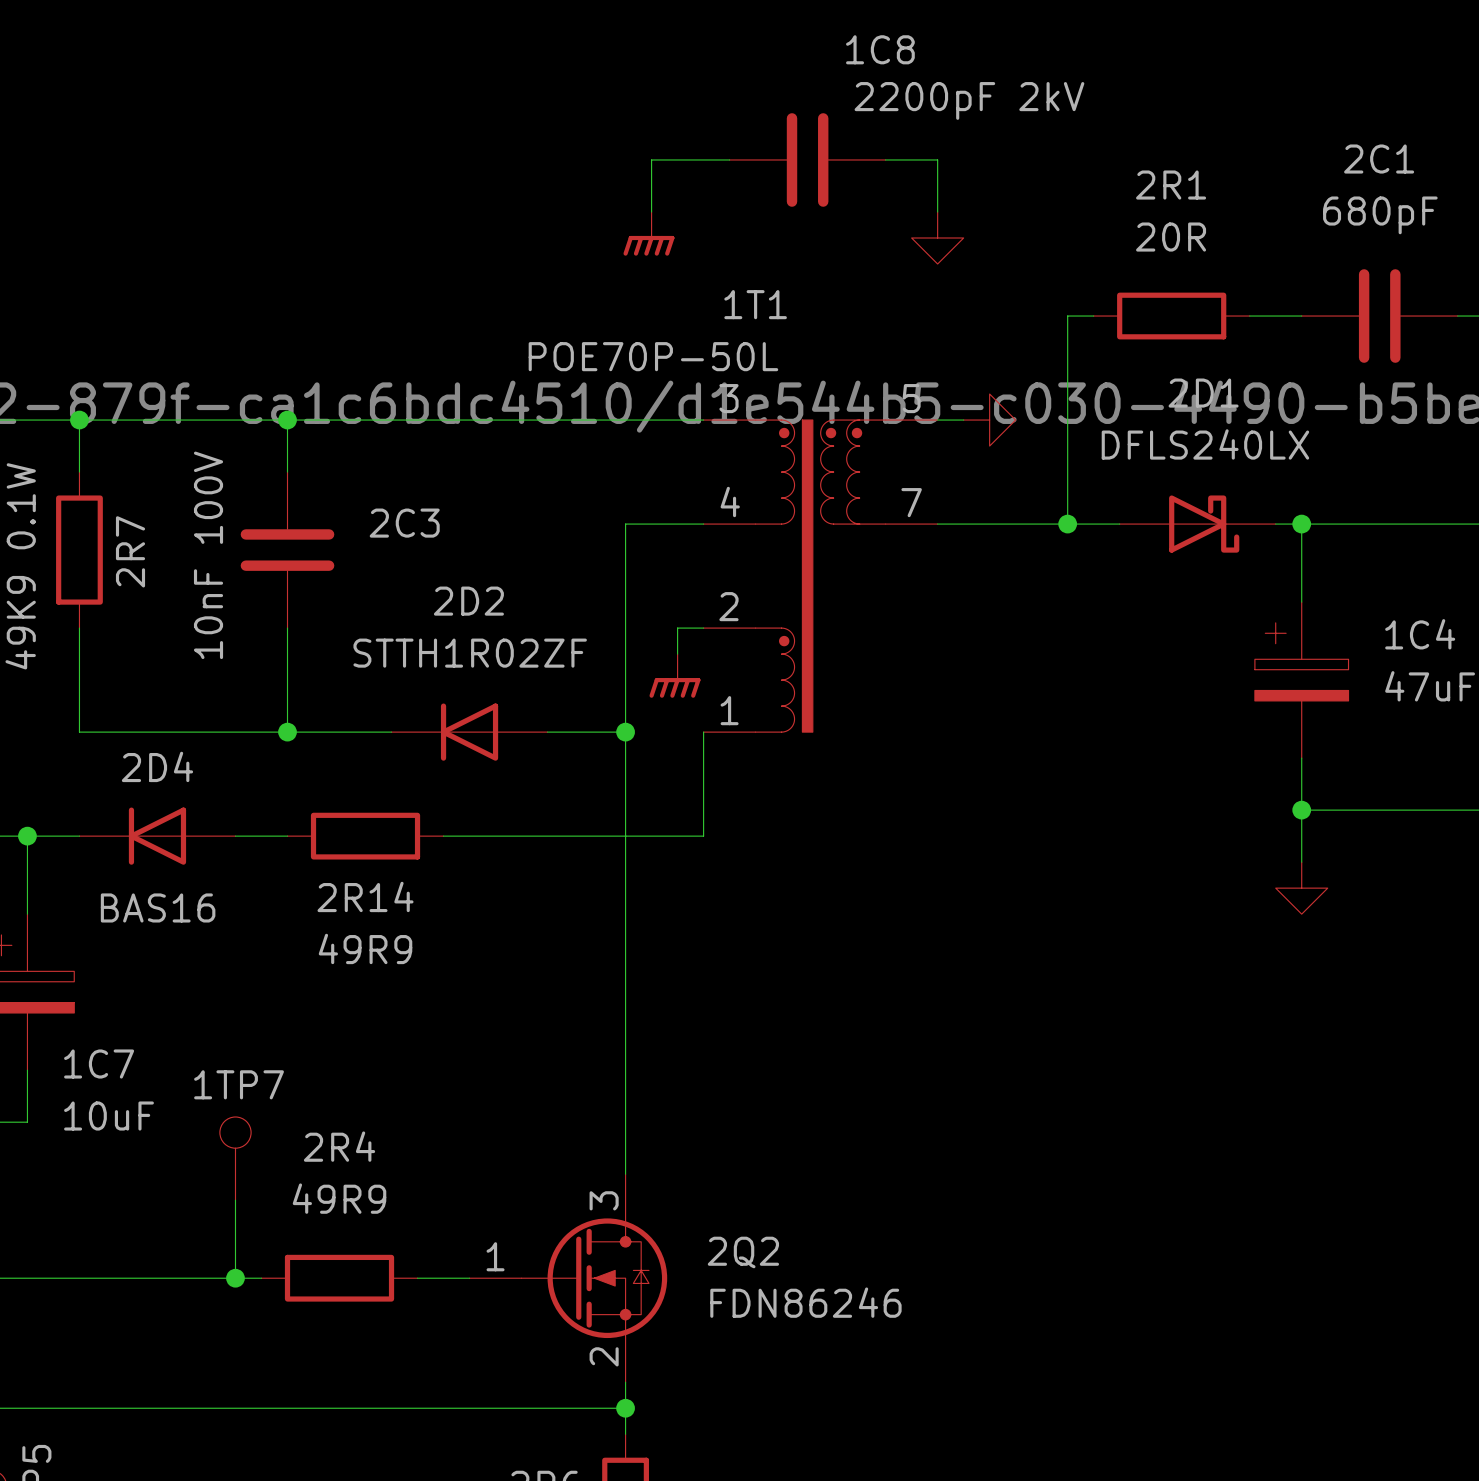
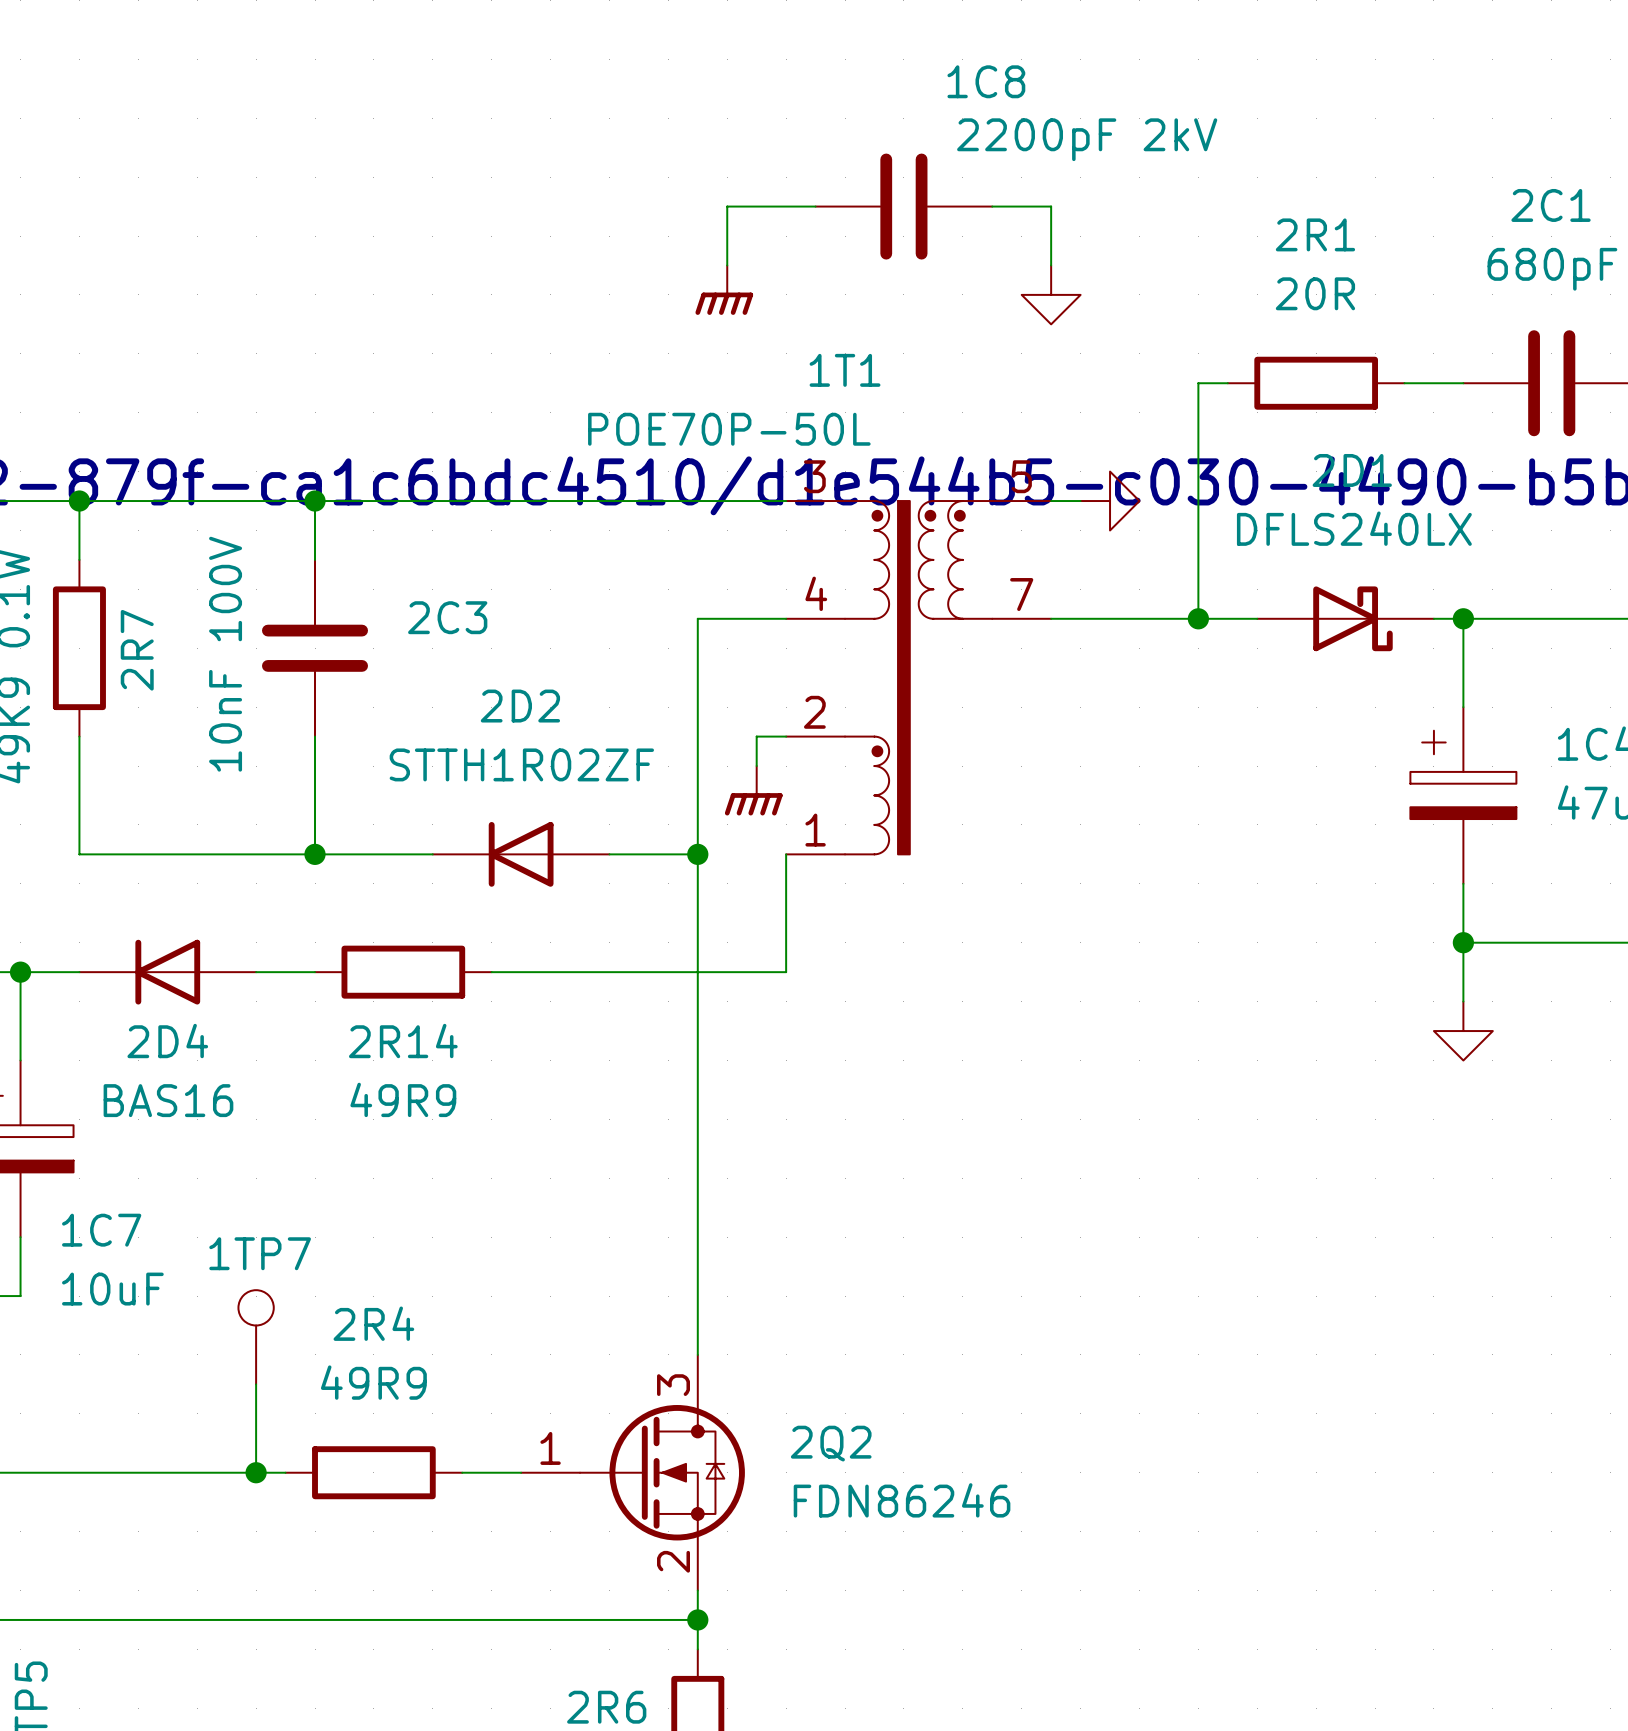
2D4 name position: 2D4 (157, 766) -> 2D4 (167, 1041)
2D4 value position: BAS16 (158, 907) -> BAS16 (168, 1100)

